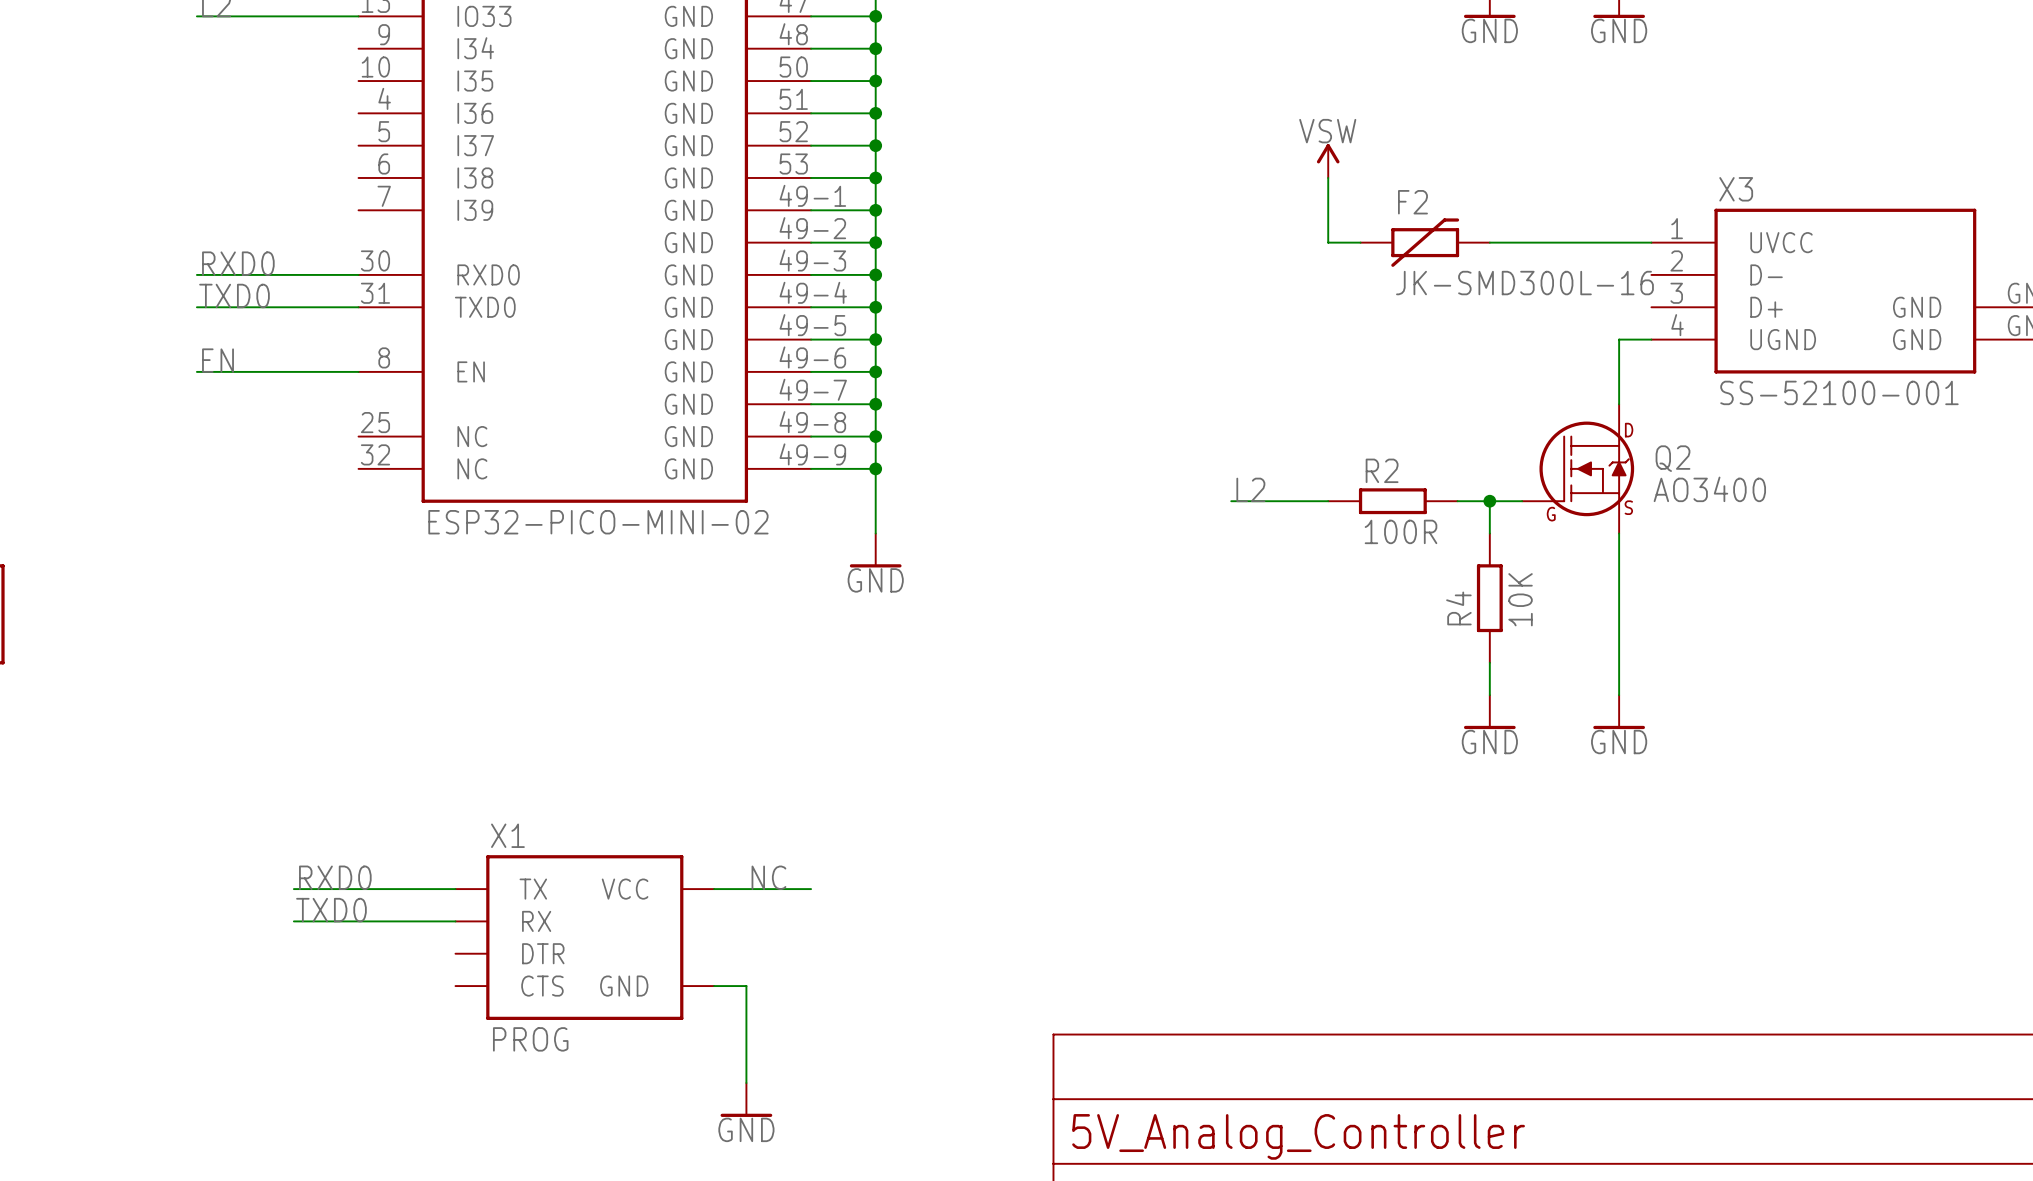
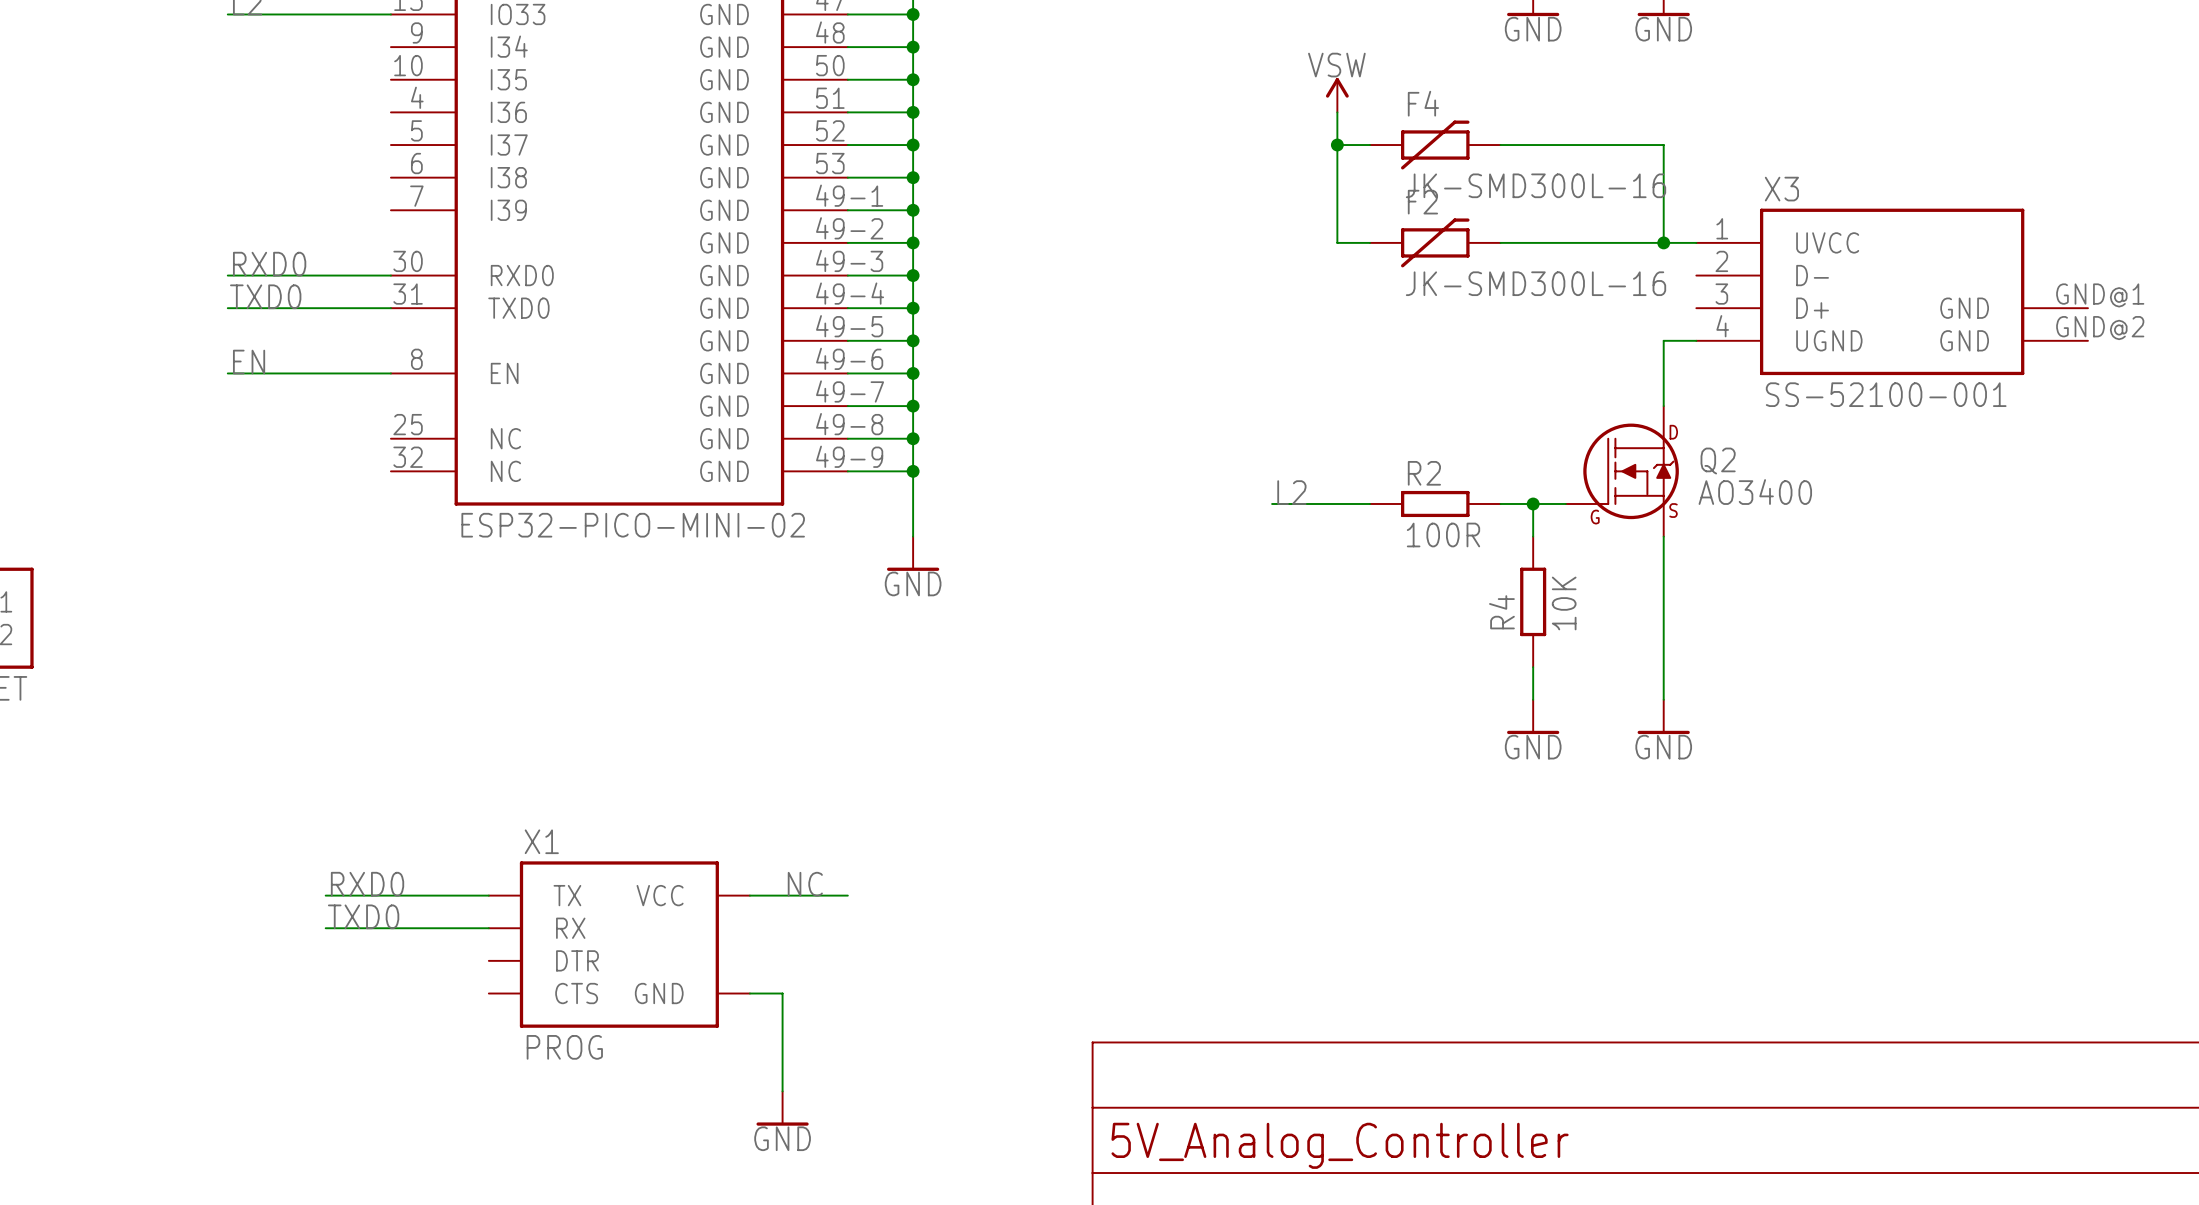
wire: none -> (1337, 112) (1337, 242) (1370, 242)
wire: none -> (1337, 145) (1370, 145)
junction: none -> (1337, 145)
F4: none -> JK-SMD300L-16 (1435, 145)
wire: none -> (1500, 145) (1663, 145) (1663, 242)
power symbol position: VSW (1328, 161) -> VSW (1337, 95)
wire: (1328, 177) (1328, 242) (1360, 242) -> none
F2 position: (1425, 242) -> (1435, 242)
junction: none -> (1663, 242)

